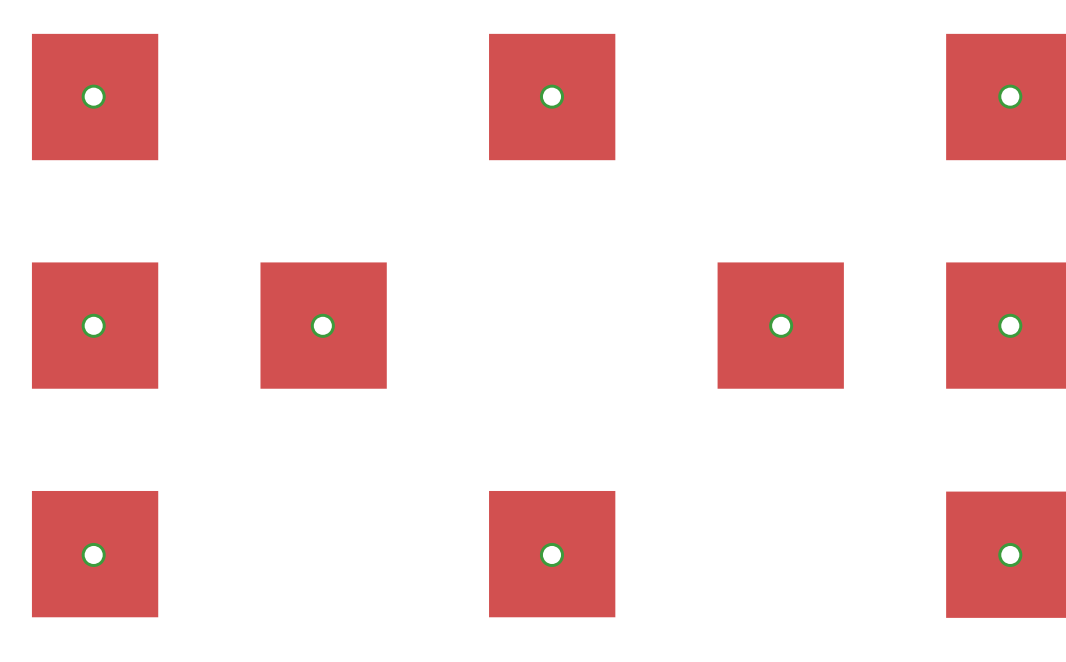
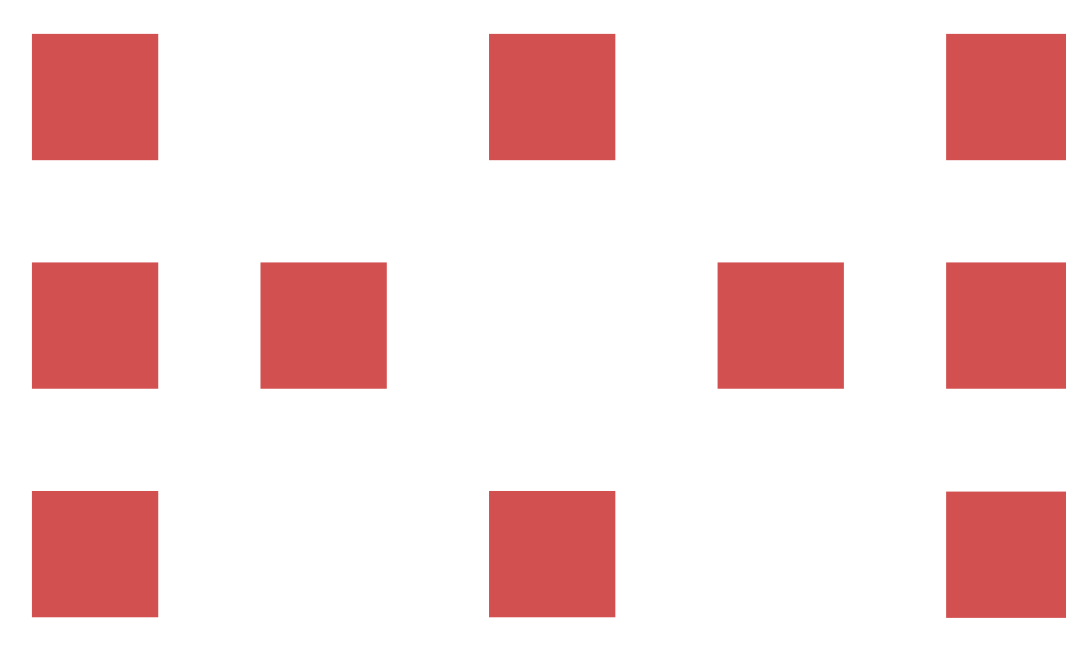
via: (93, 96) -> none
via: (551, 96) -> none
via: (1010, 96) -> none
via: (93, 325) -> none
via: (322, 325) -> none
via: (781, 325) -> none
via: (1010, 325) -> none
via: (93, 554) -> none
via: (551, 554) -> none
via: (1010, 554) -> none

